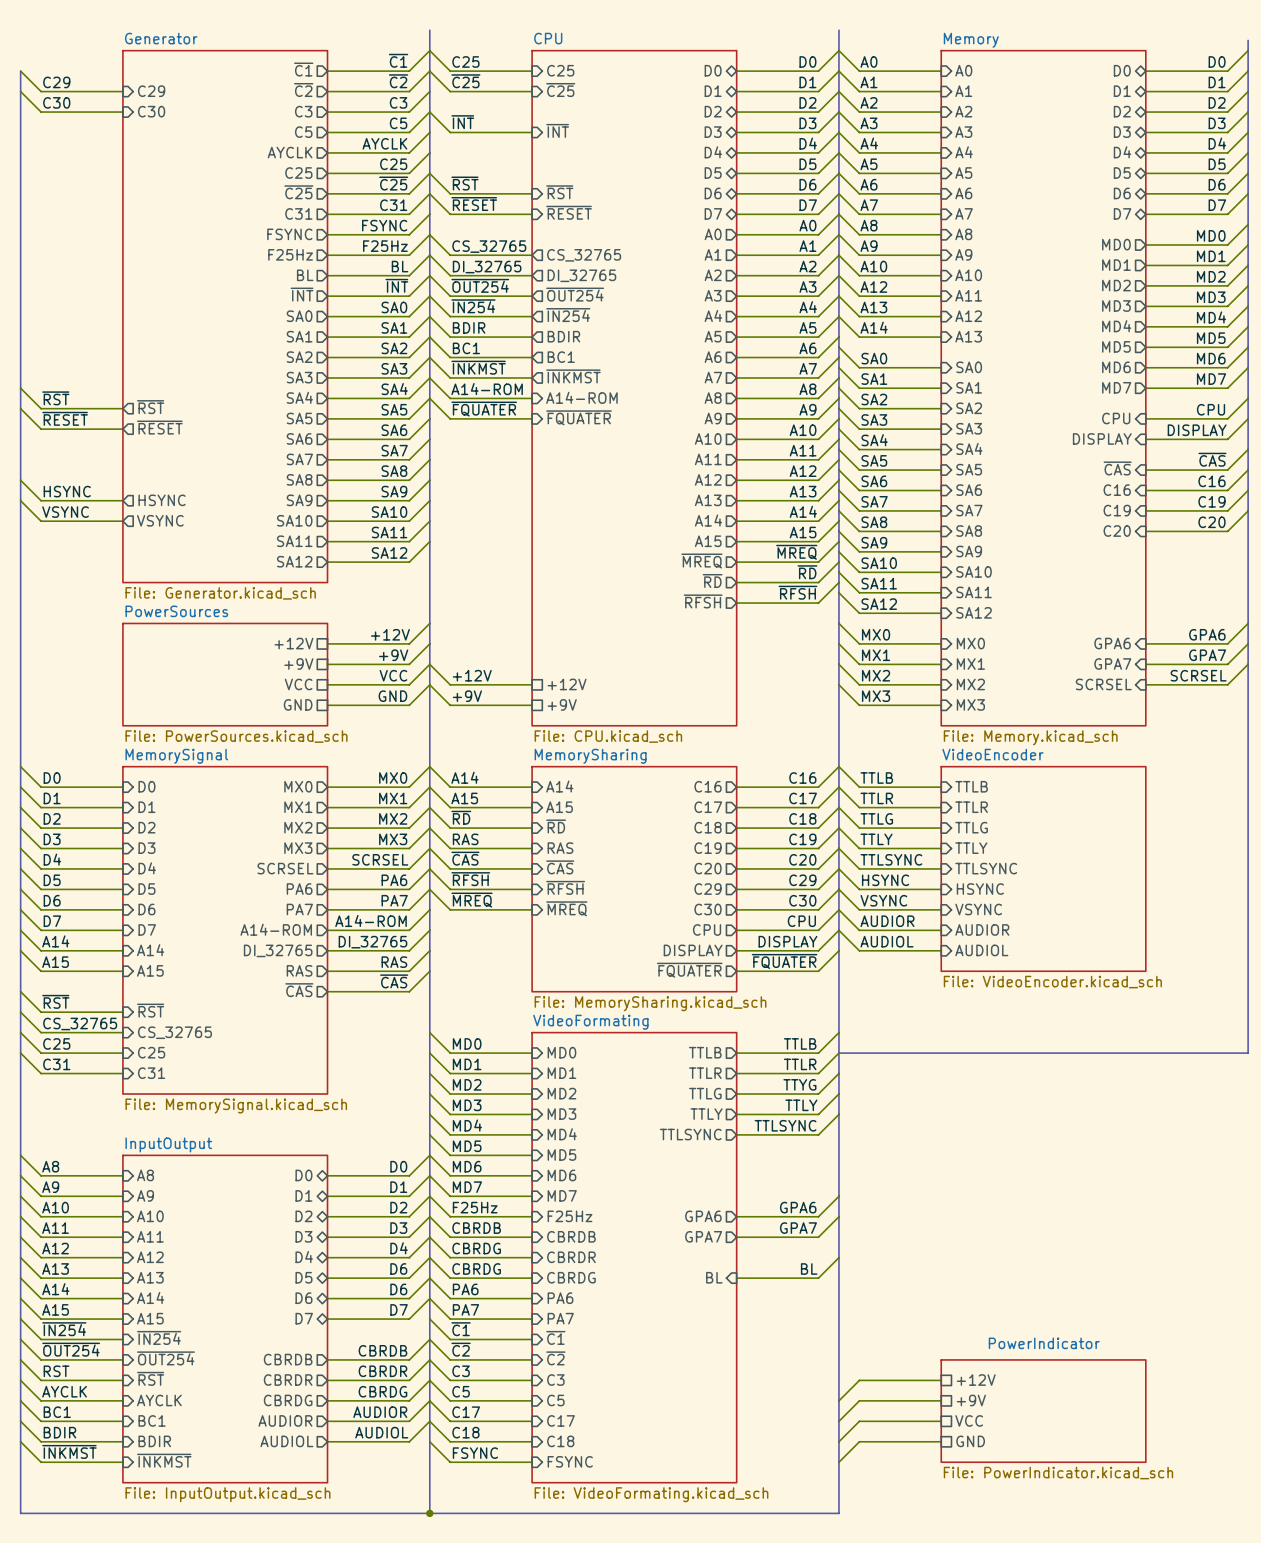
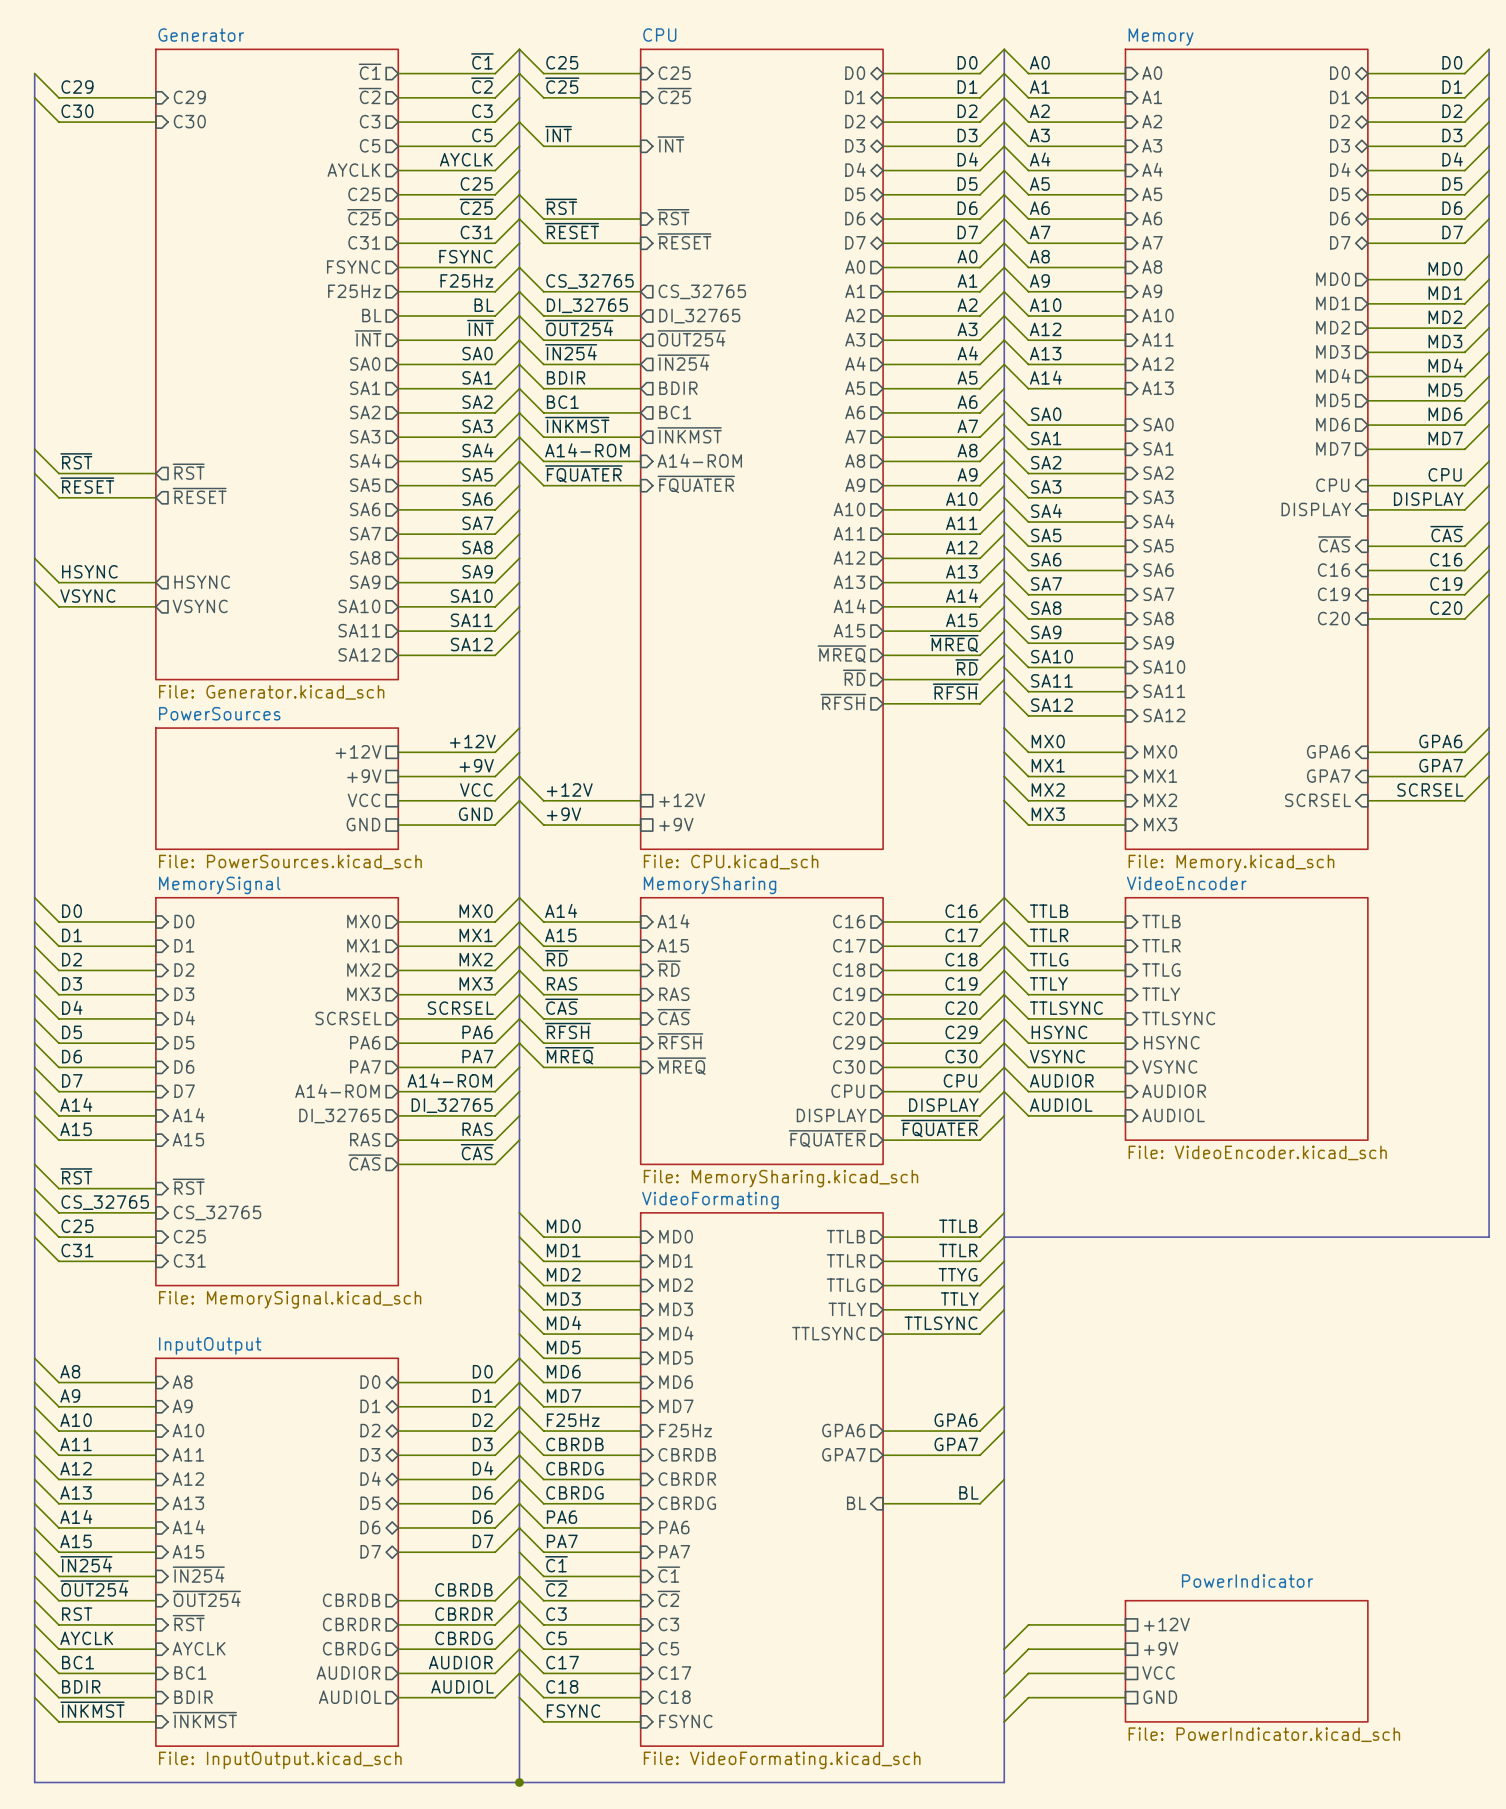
bus: (429, 30) (429, 50) -> none
bus: (838, 30) (838, 50) -> none
bus: (1248, 40) (1248, 50) -> none

